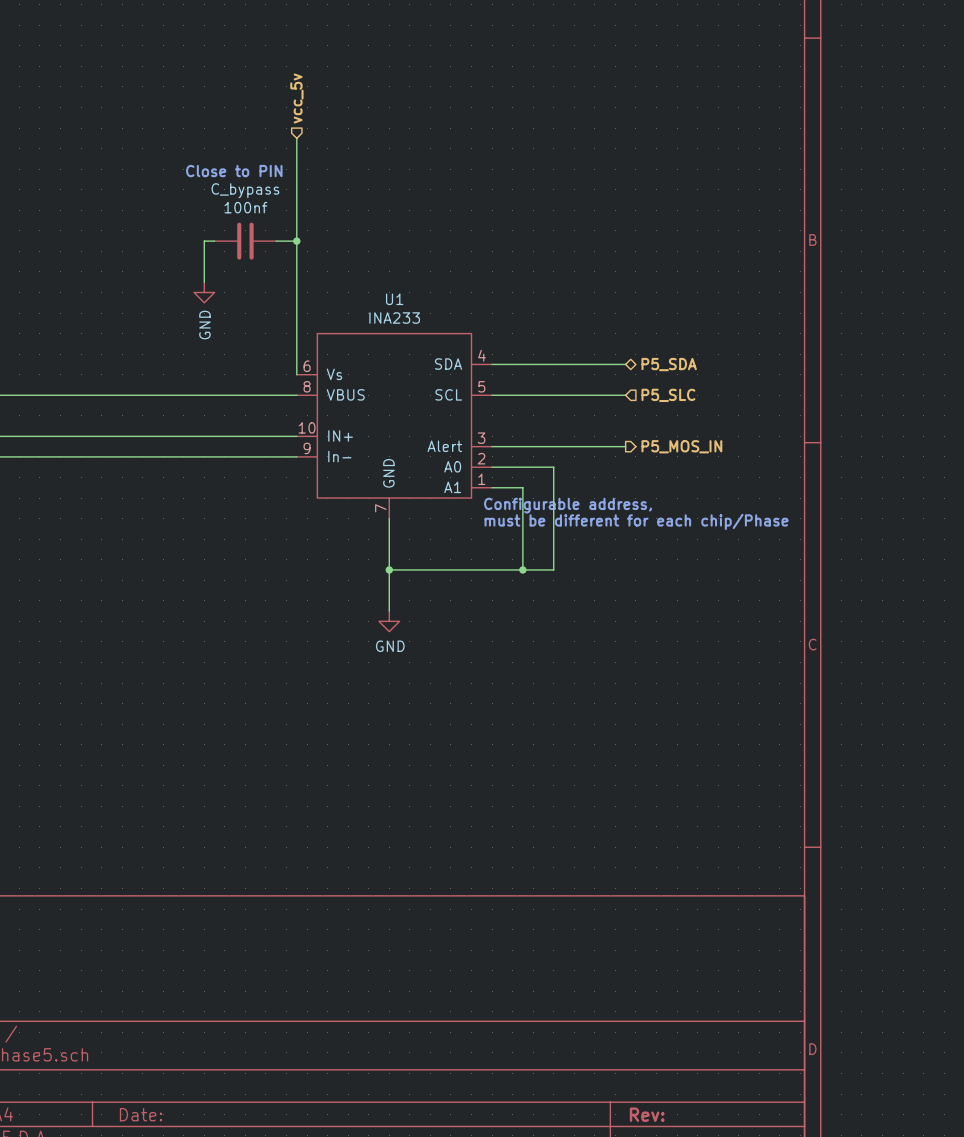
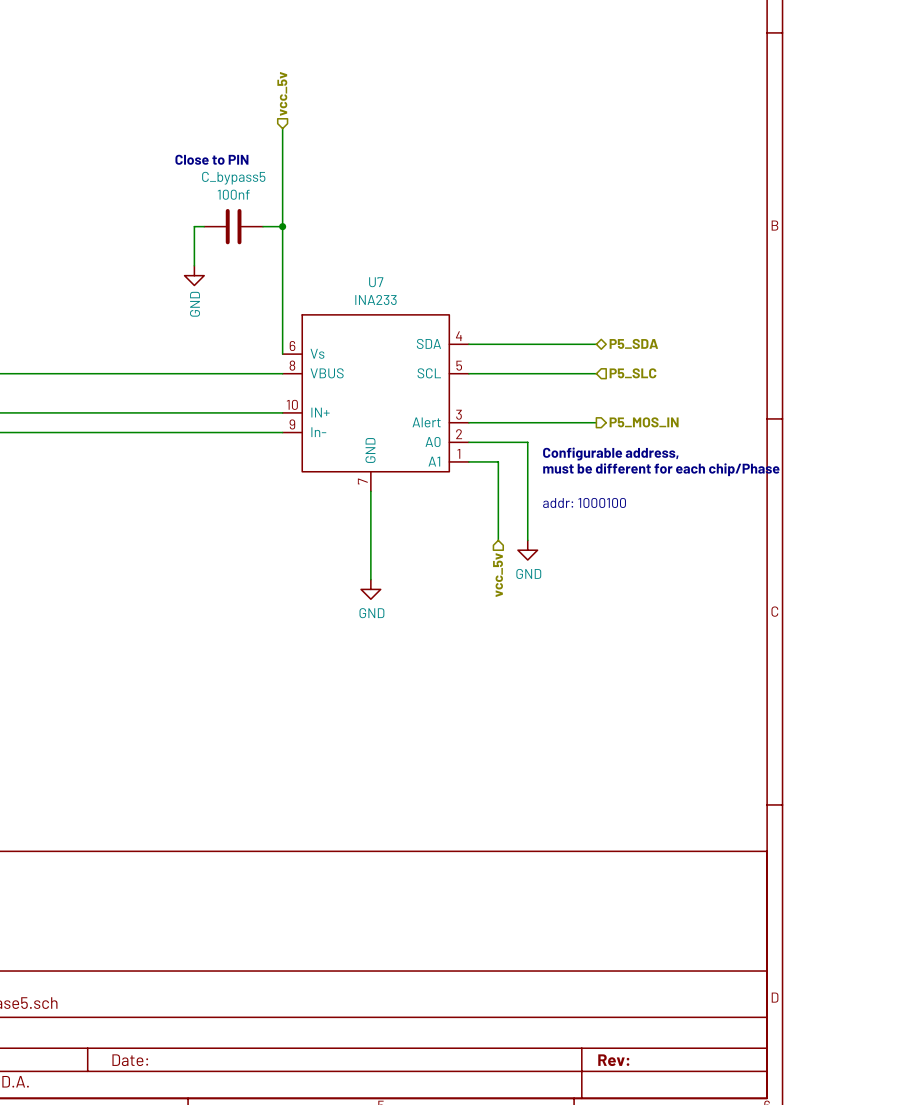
C_bypass name: C_bypass (245, 190) -> C_bypass5 (233, 178)
U1 name: U1 (394, 299) -> U7 (376, 282)
text position: Configurable address, (568, 505) -> Configurable address, (610, 454)
text position: must be different for each chip/Phase (636, 521) -> must be different for each chip/Phase (661, 469)
text: none -> addr: 1000100 (584, 502)
wire: (389, 569) (553, 569) -> none
junction: (389, 569) -> none
junction: (522, 569) -> none
power symbol: none -> GND (527, 550)
hierarchical label: none -> vcc_5v (498, 575)

